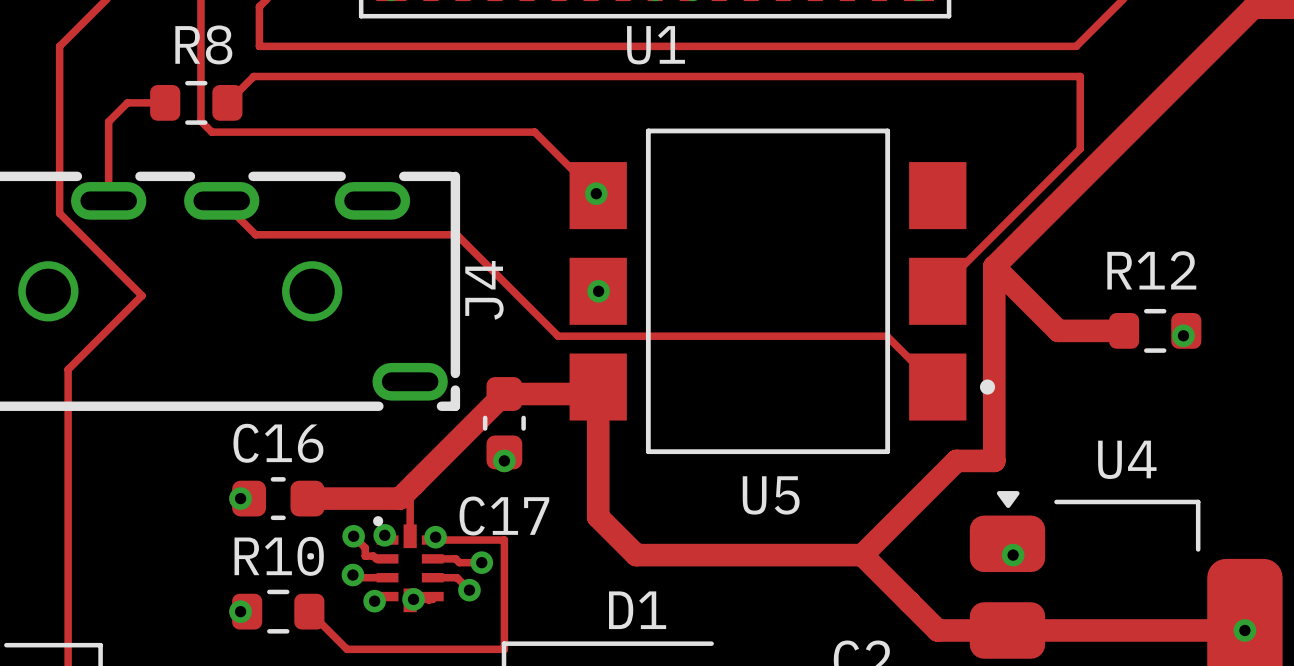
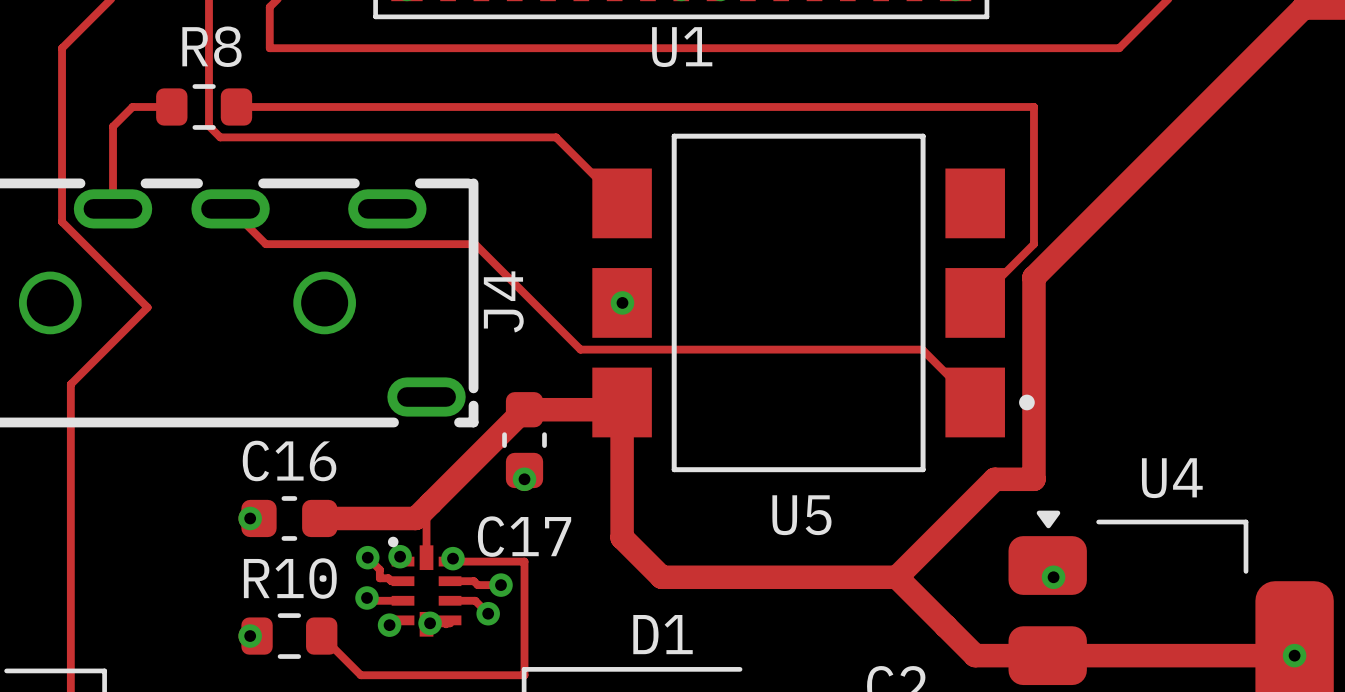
track: (227, 102) (253, 76) (1080, 76) (1080, 148) (994, 234) -> (236, 106) (1033, 106) (1033, 244)
via: (596, 193) -> none
track: (994, 266) (1058, 330) (1124, 330) -> none
R12: (1155, 330) -> none
via: (1183, 335) -> none

